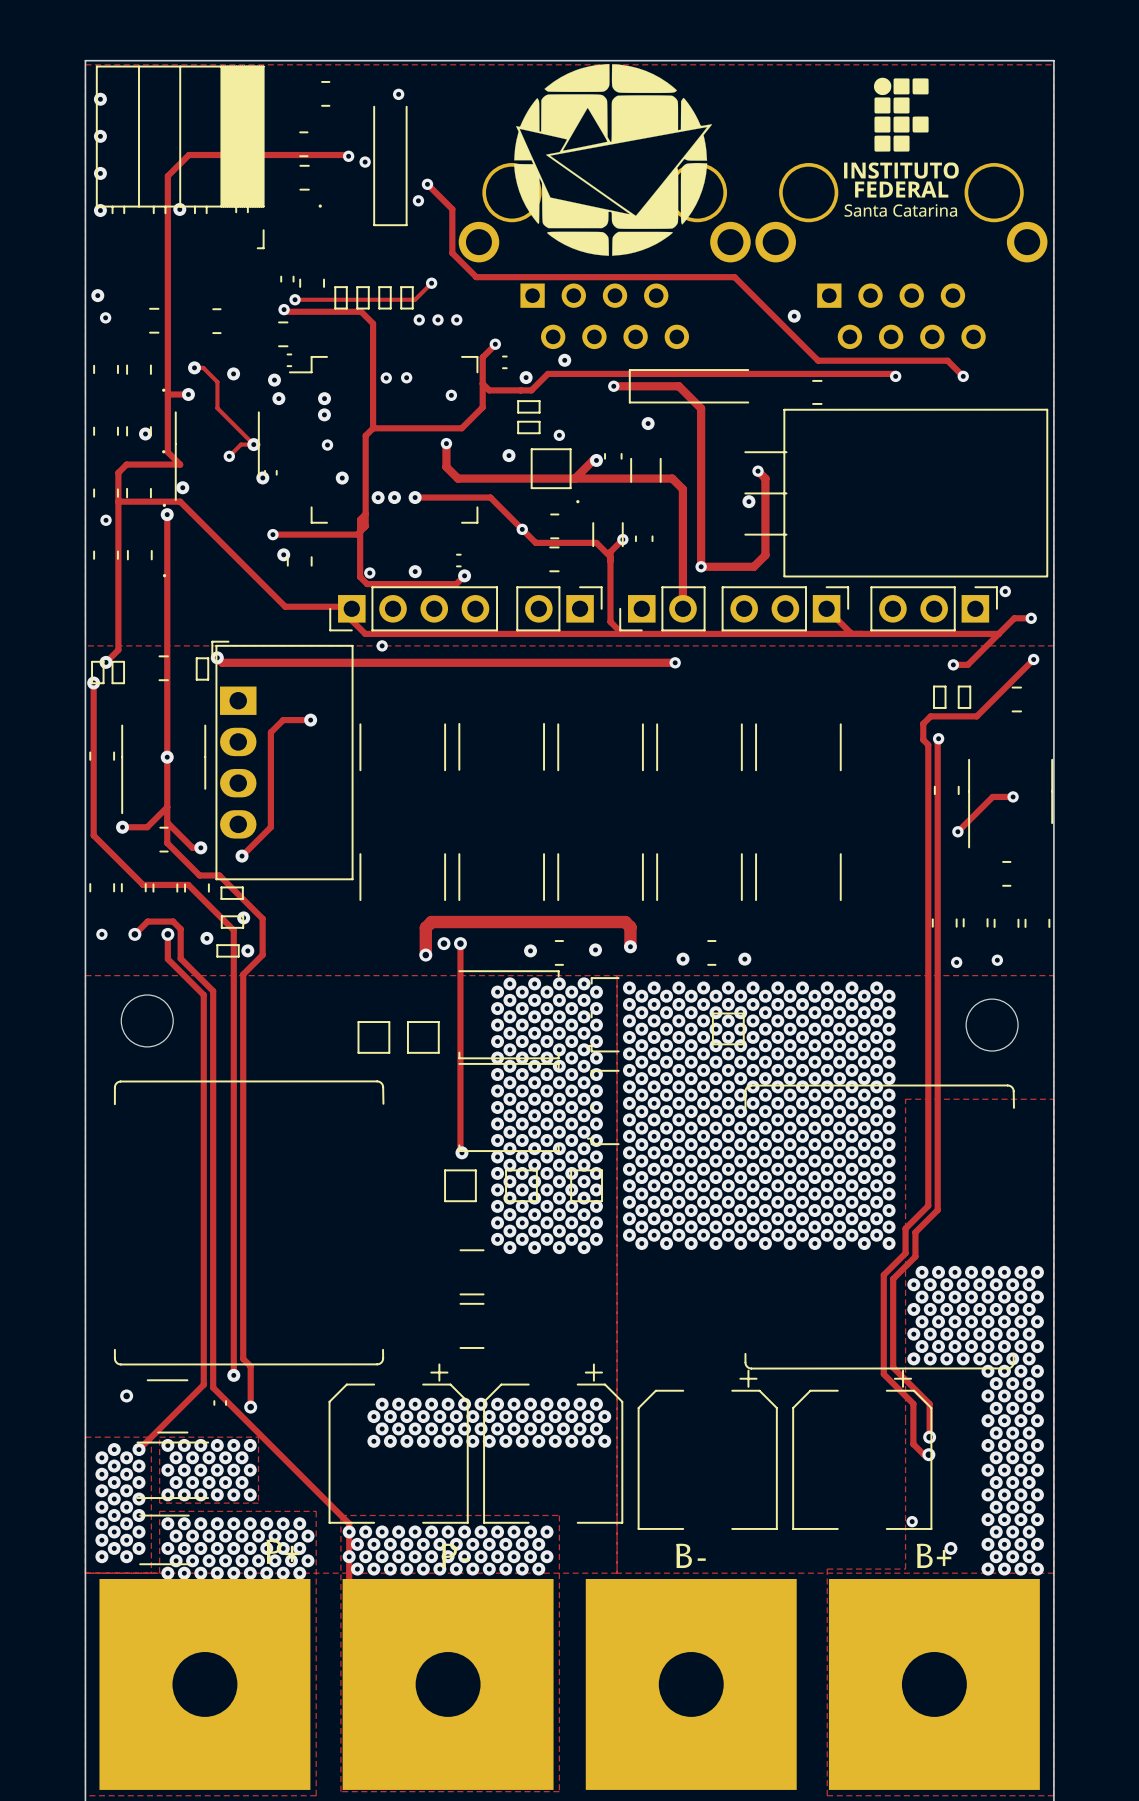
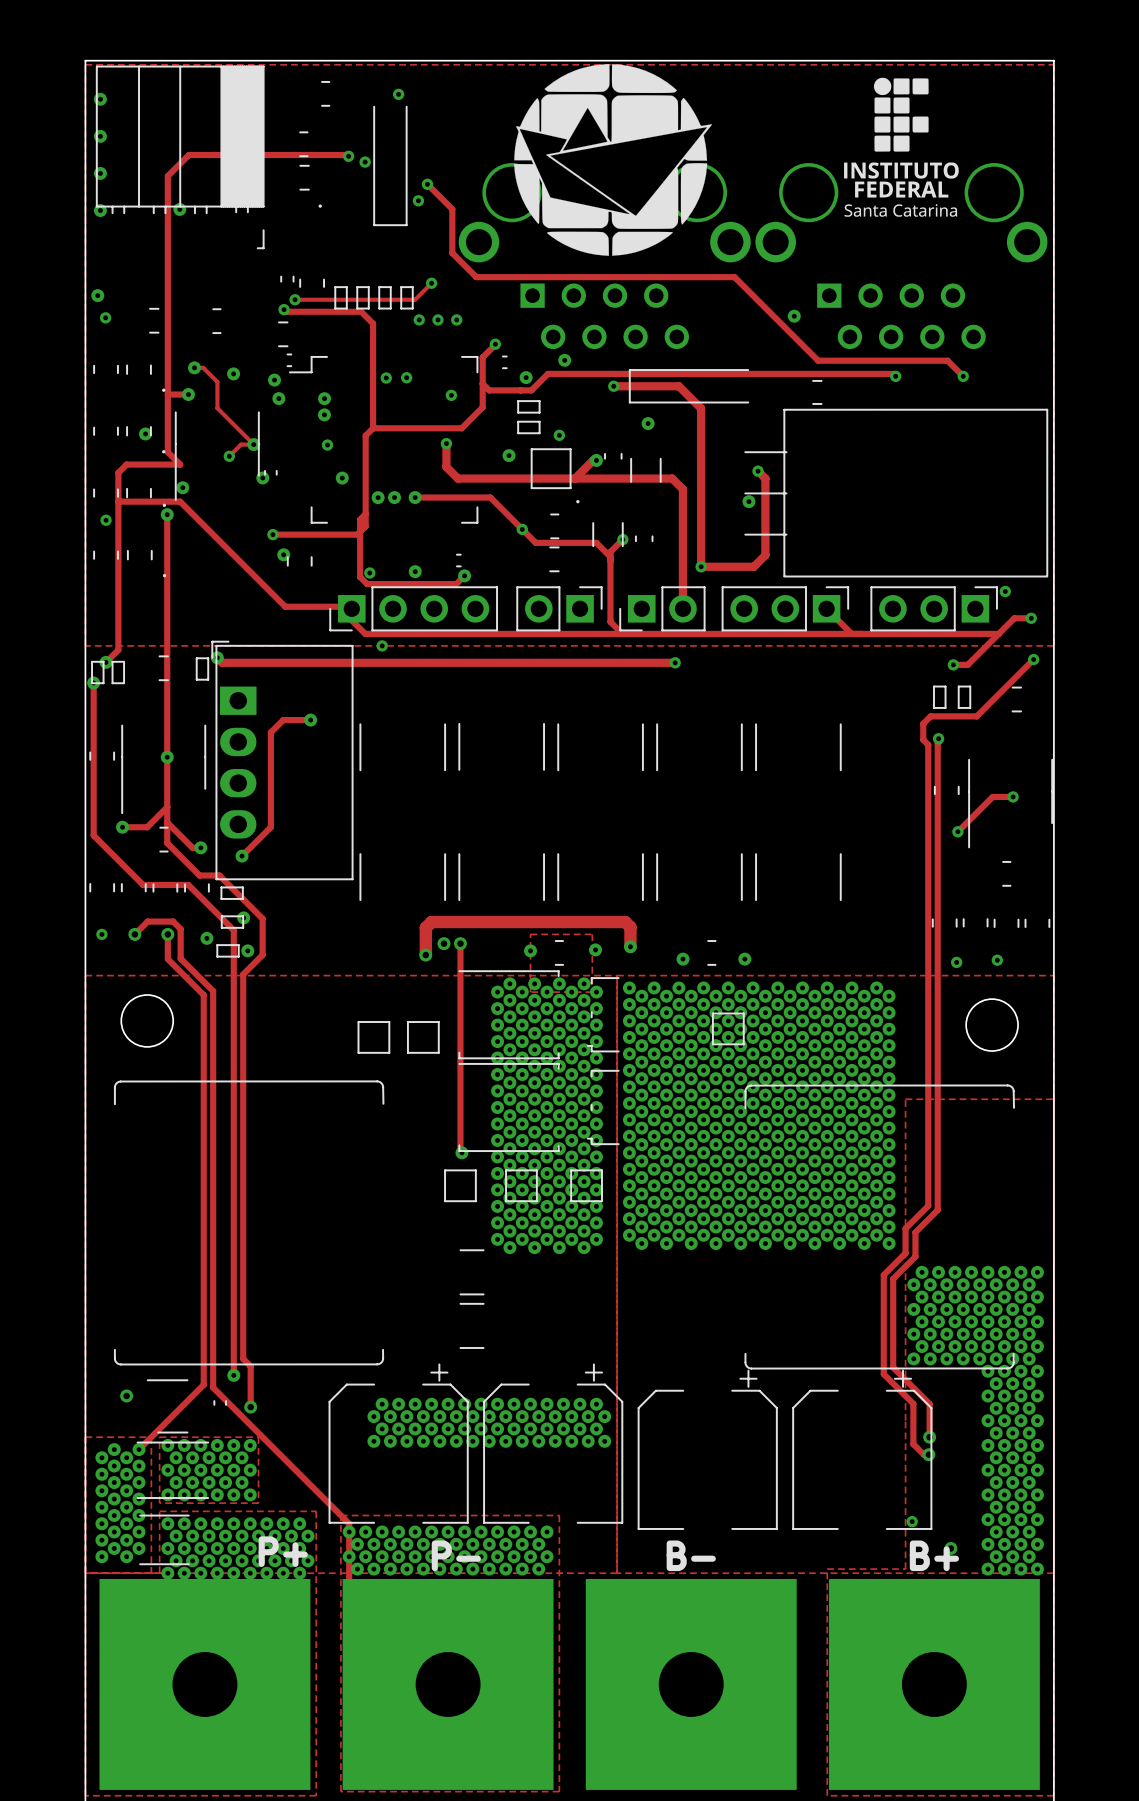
zone outline: none -> (530, 934) (530, 992) (592, 992) (592, 934) (530, 934)

